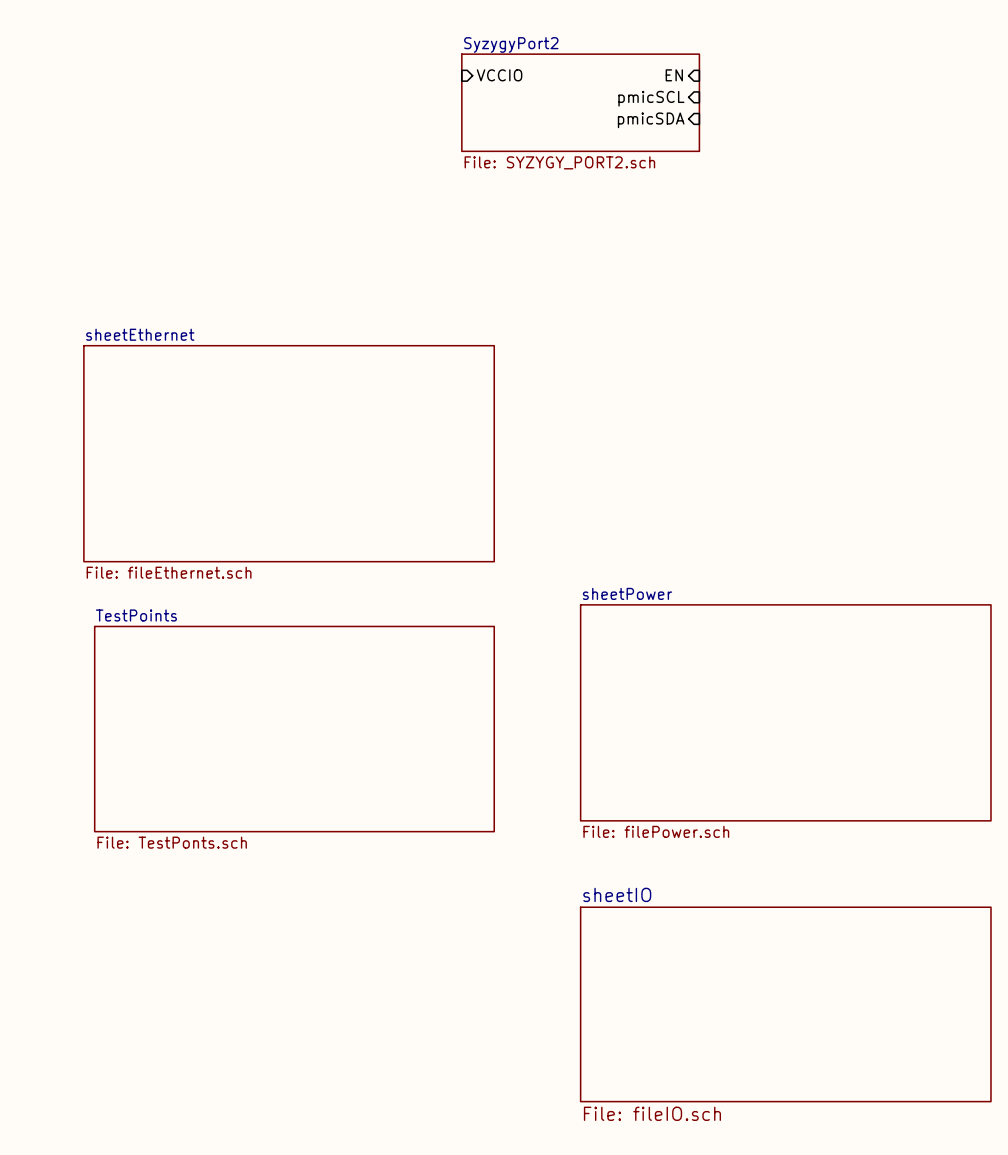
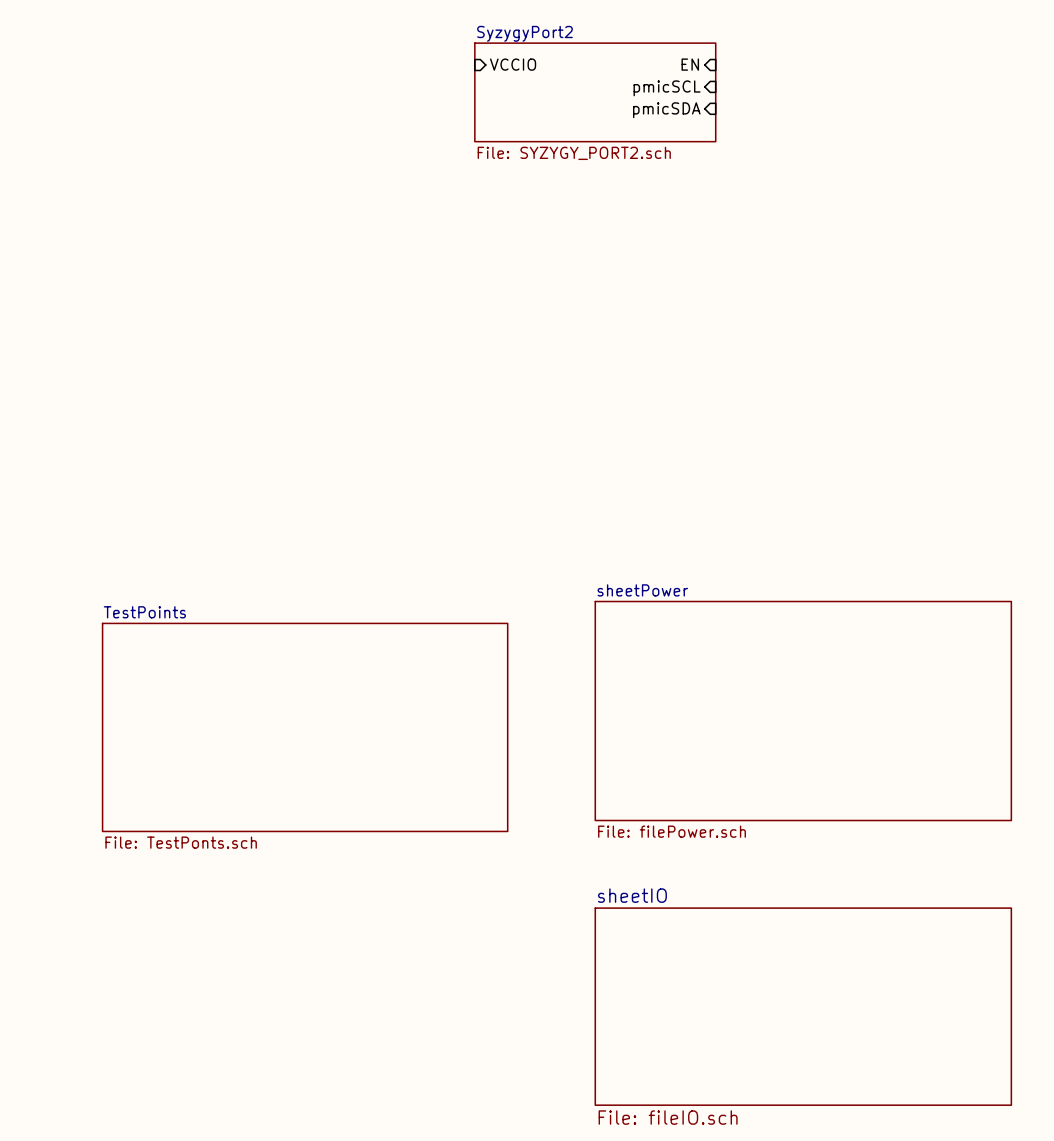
sheet sheetEthernet: File: fileEthernet.sch (289, 453) -> none

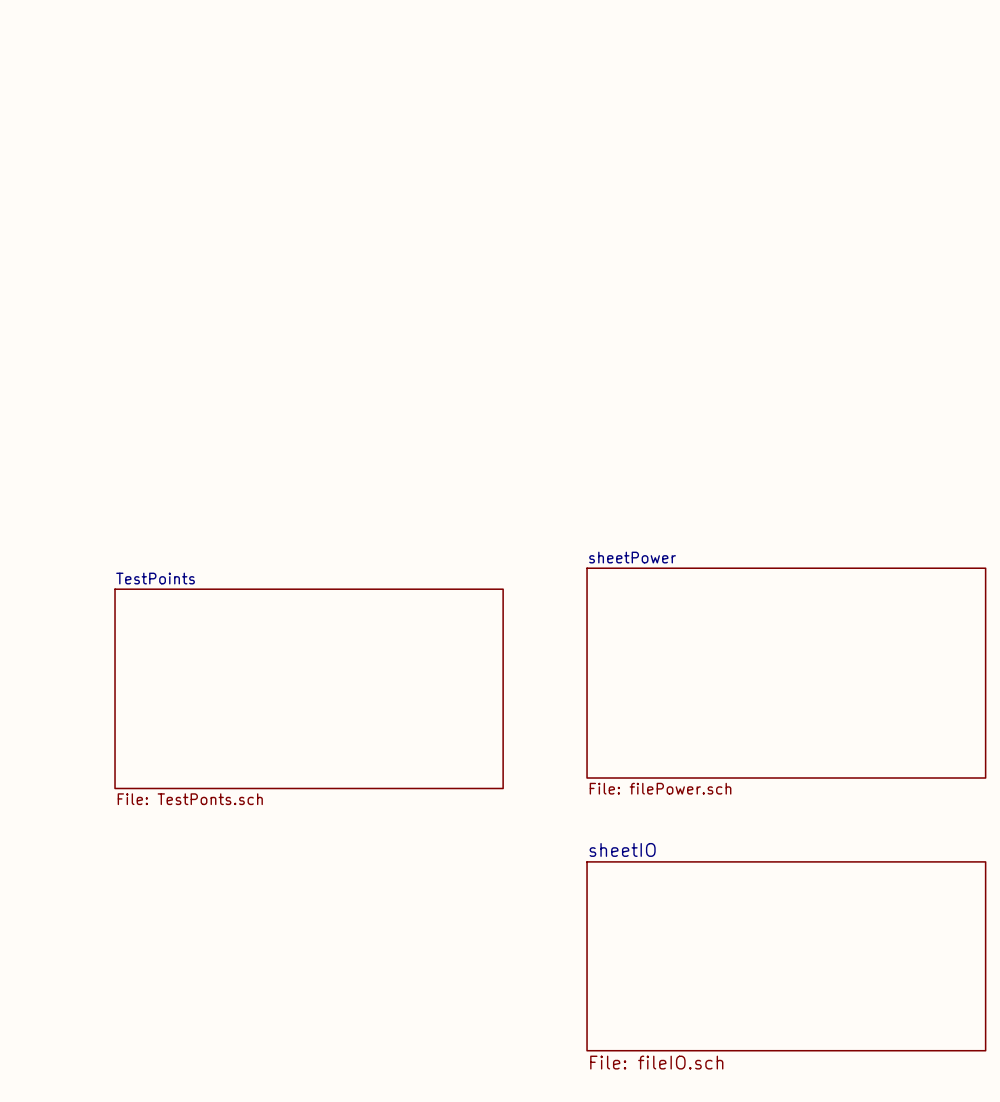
sheet pin: VCCIO (513, 64) -> none
sheet pin: EN (690, 64) -> none
sheet pin: pmicSCL (667, 88) -> none
sheet SyzygyPort2: File: SYZYGY_PORT2.sch (595, 92) -> none
sheet pin: pmicSDA (666, 110) -> none

